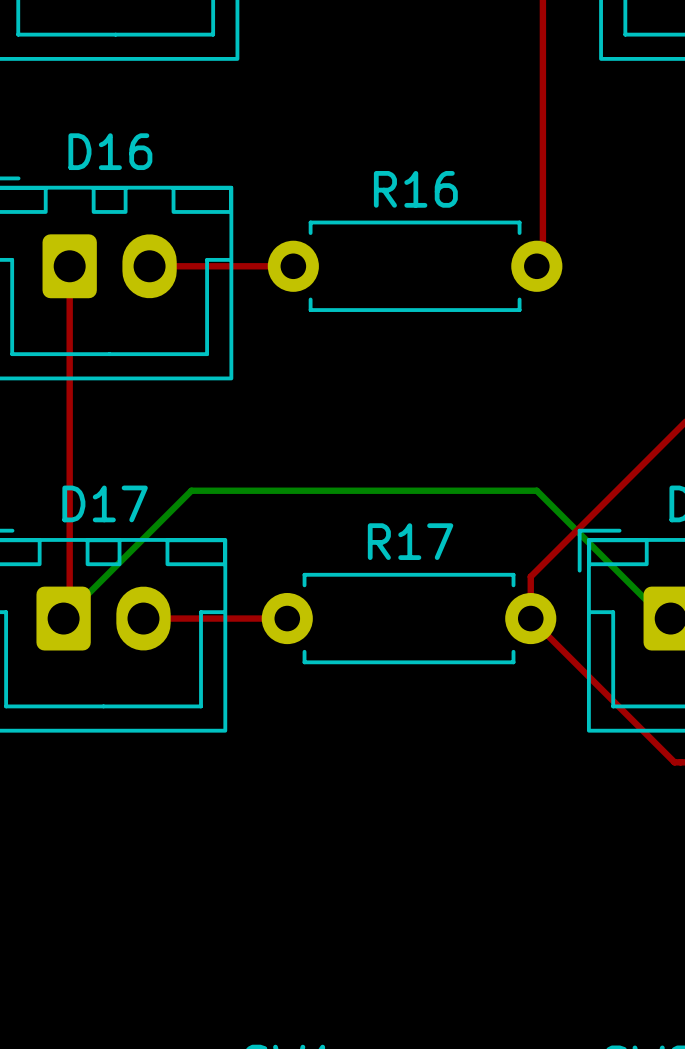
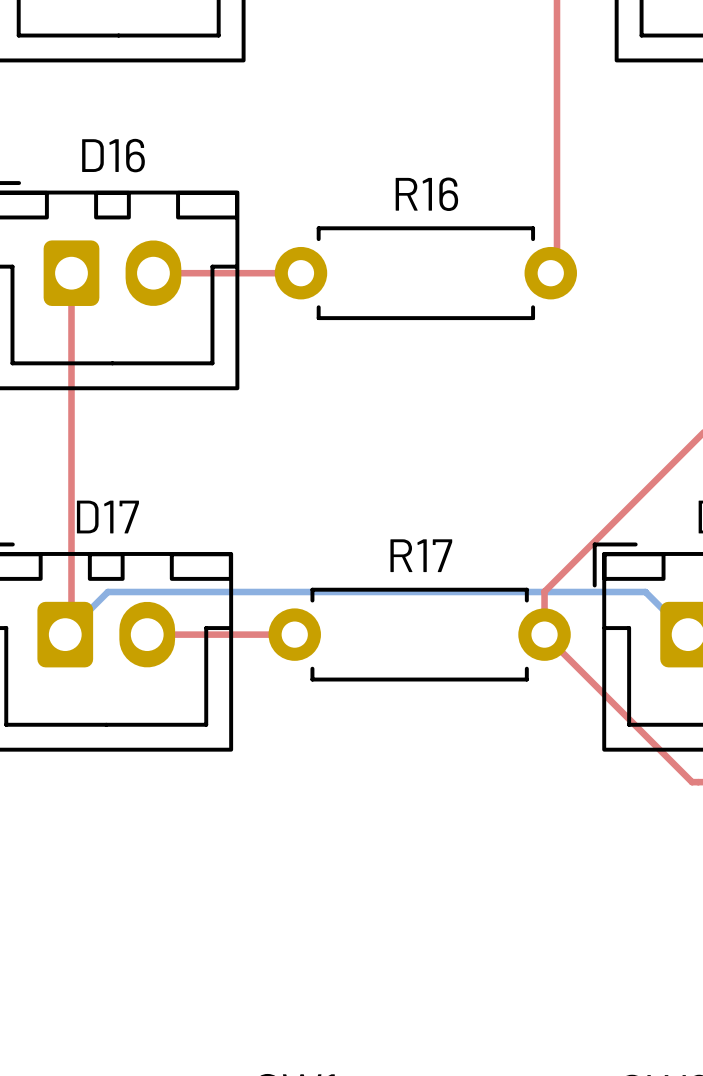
bottom track: (105, 577) (191, 490) (536, 490) (664, 618) (670, 618) -> (107, 592) (645, 592) (688, 634)

